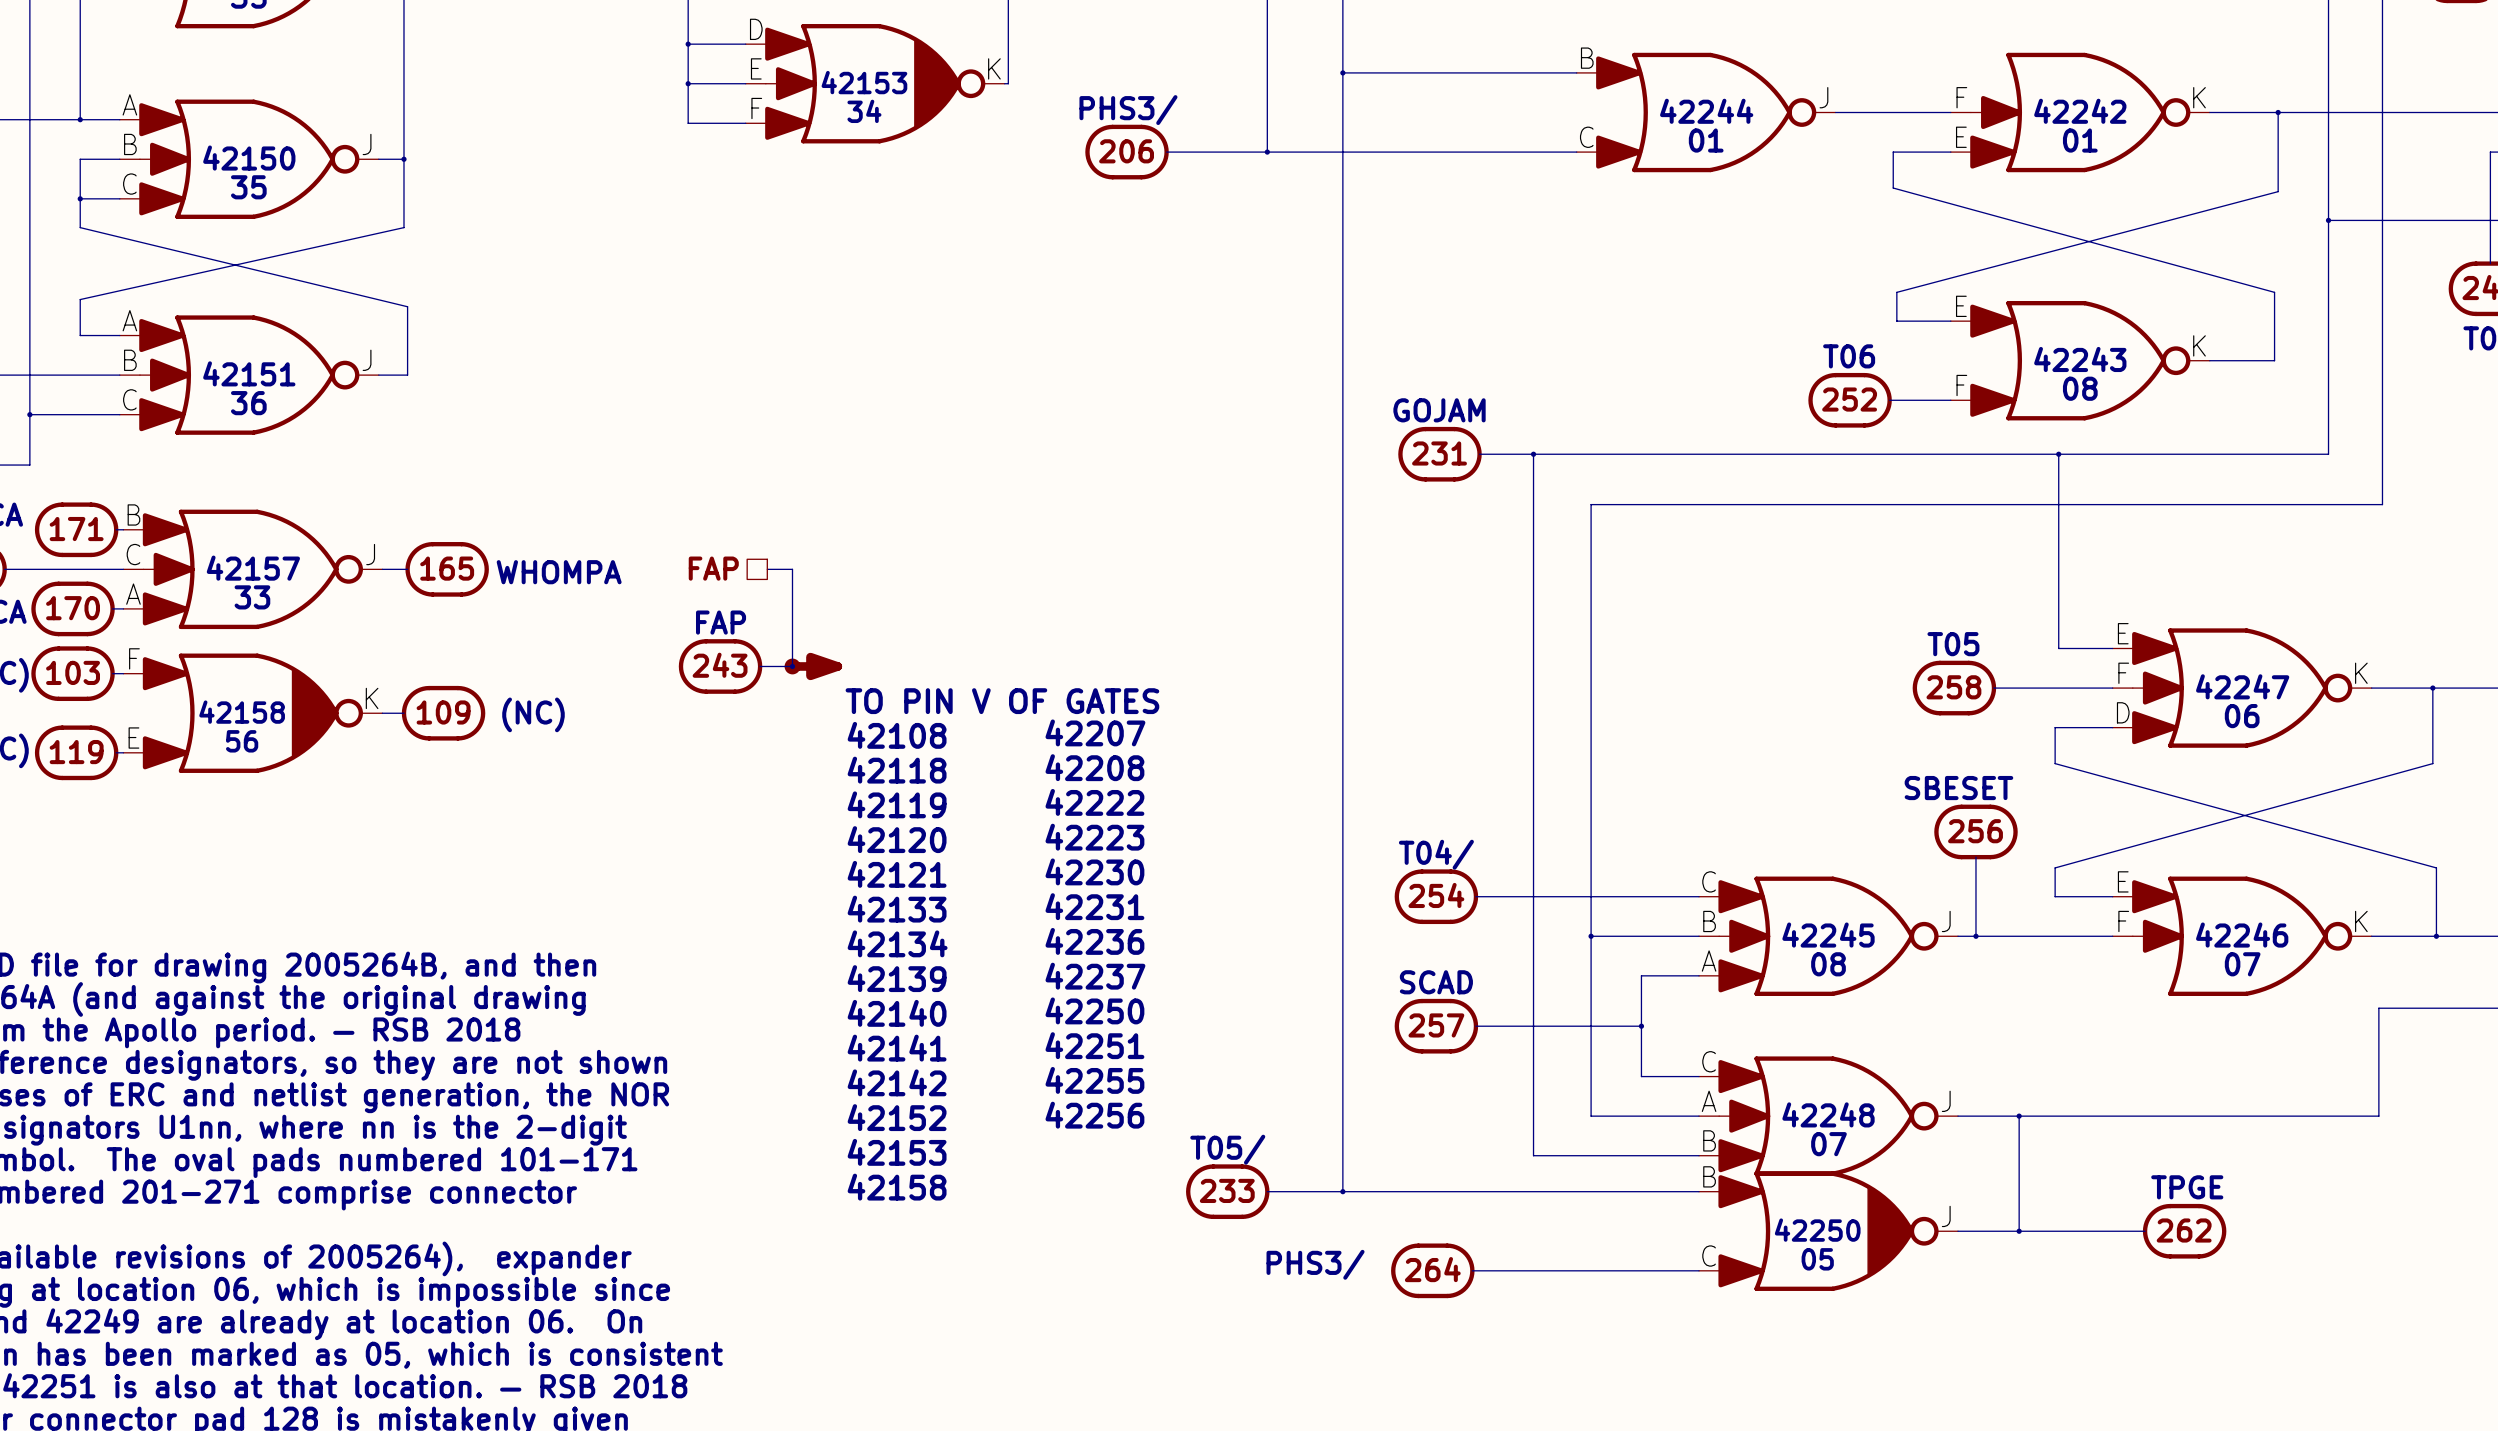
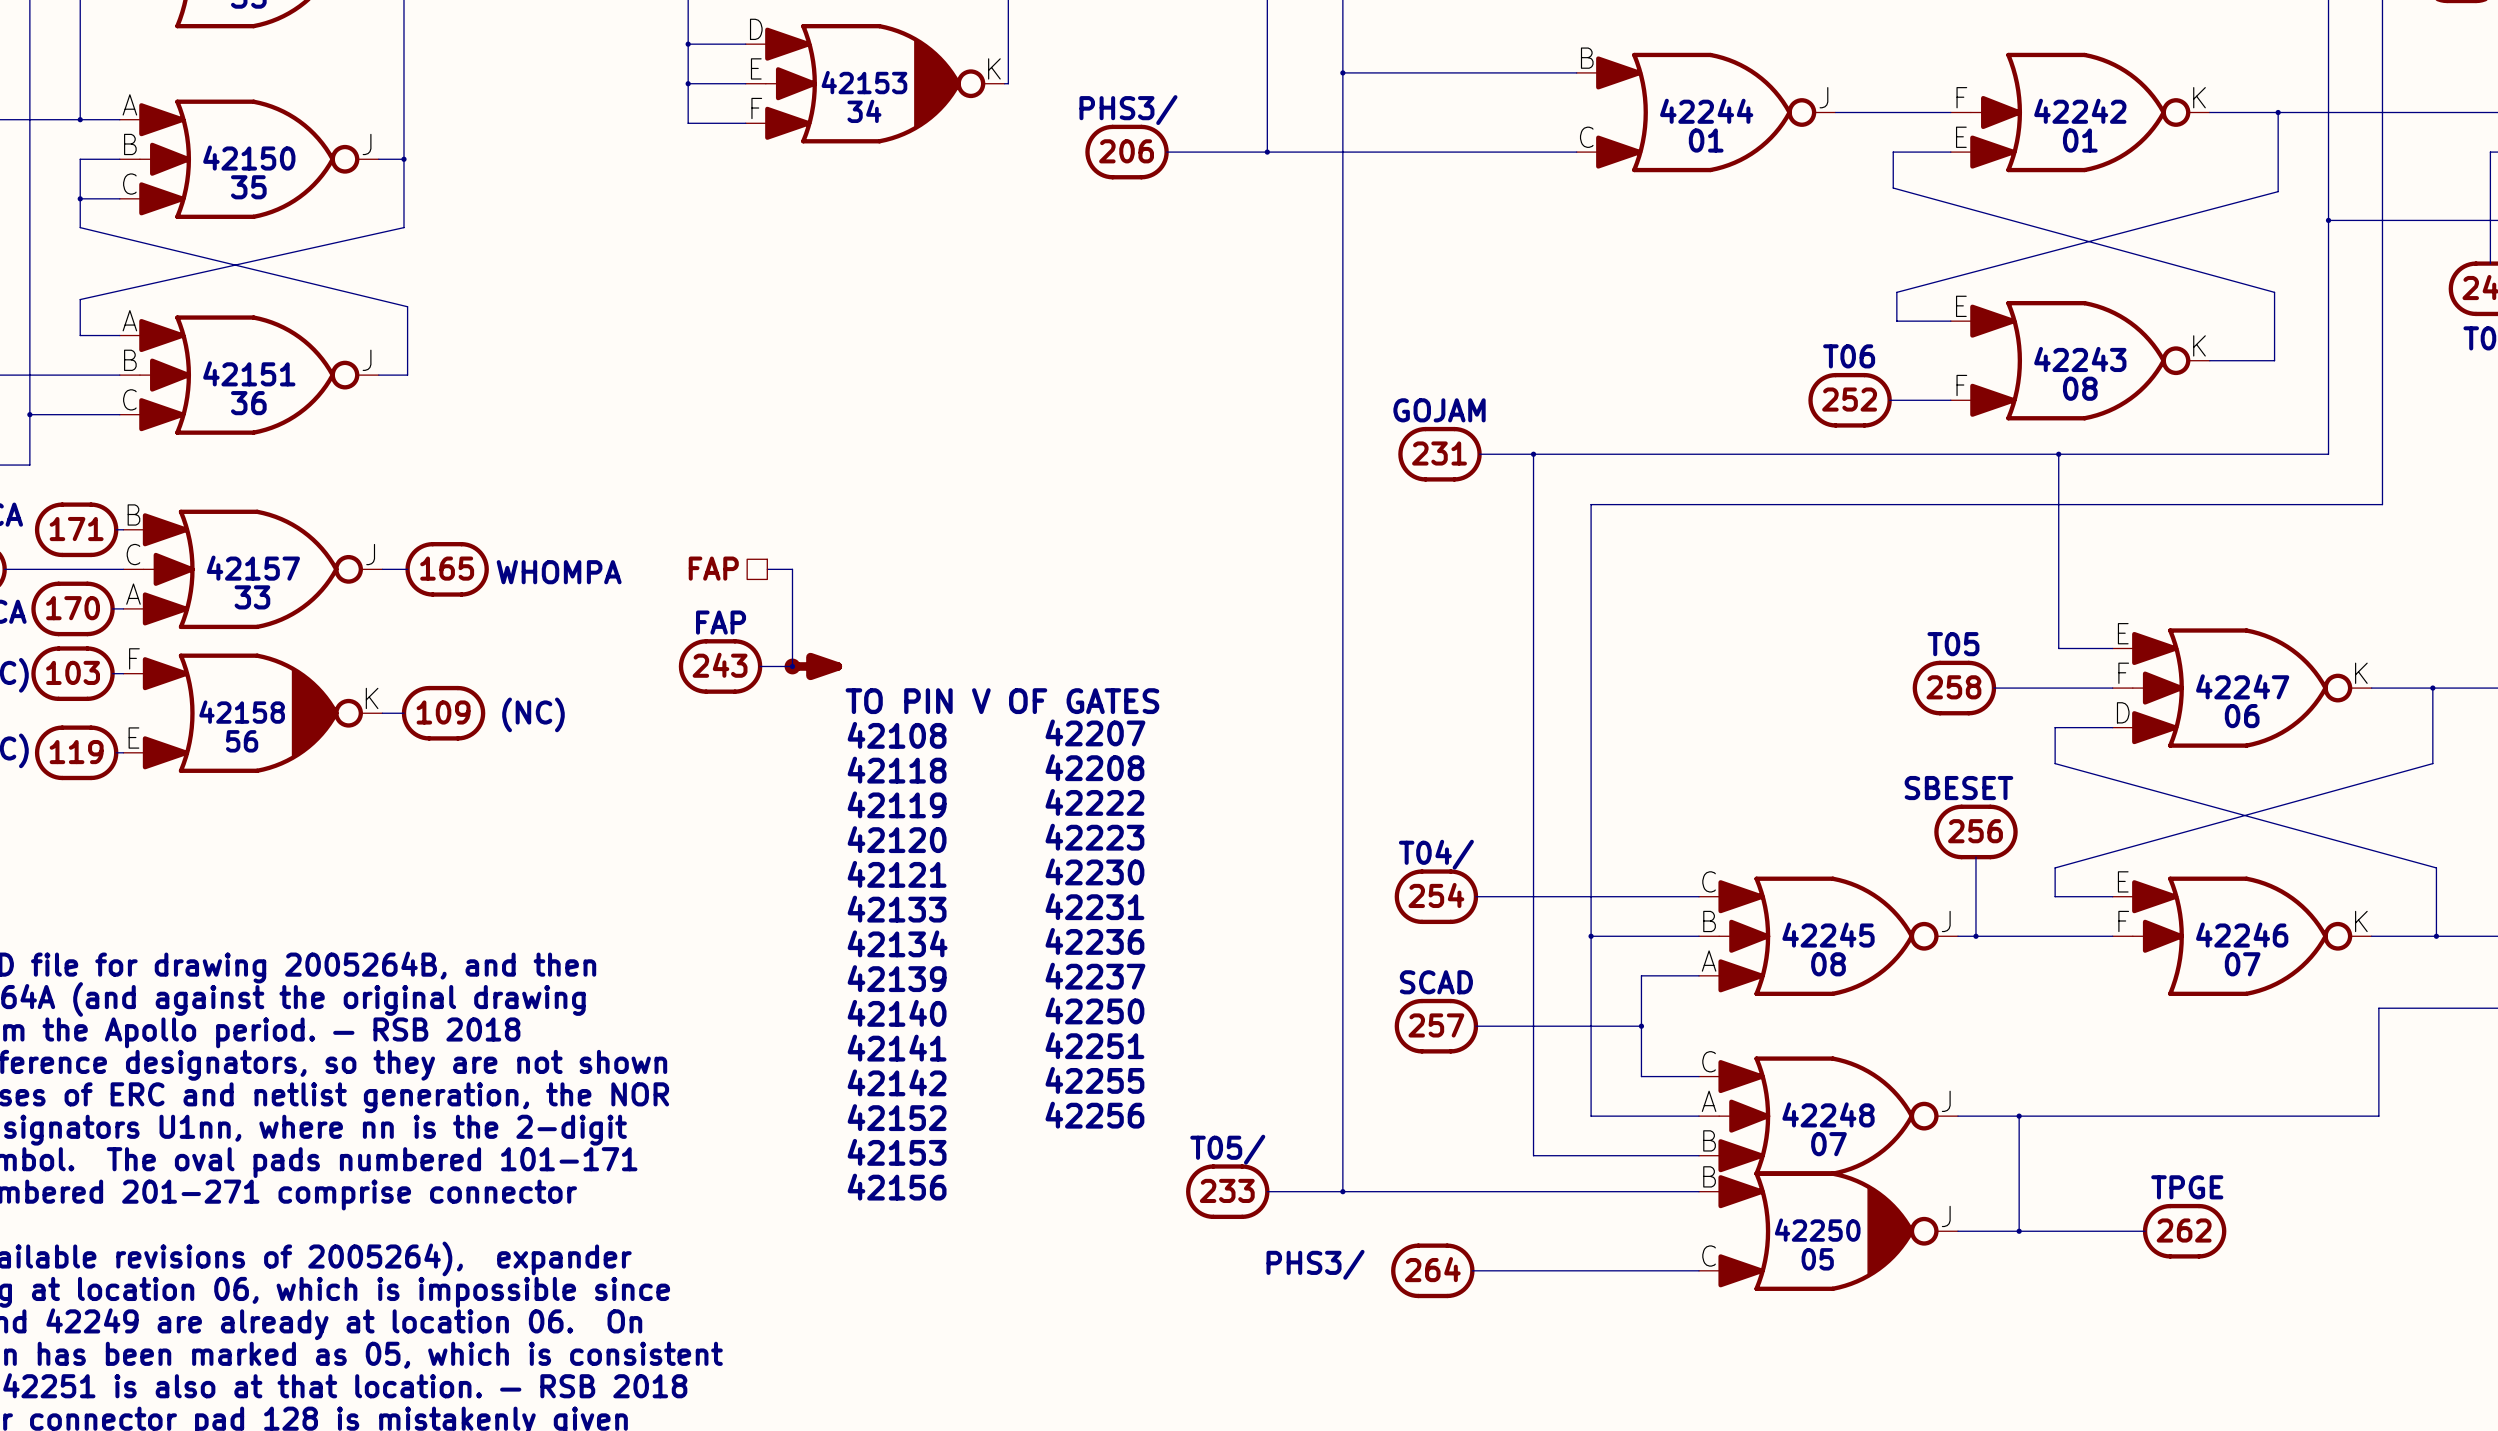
text: 42158 (897, 1187) -> 42156 (897, 1187)

